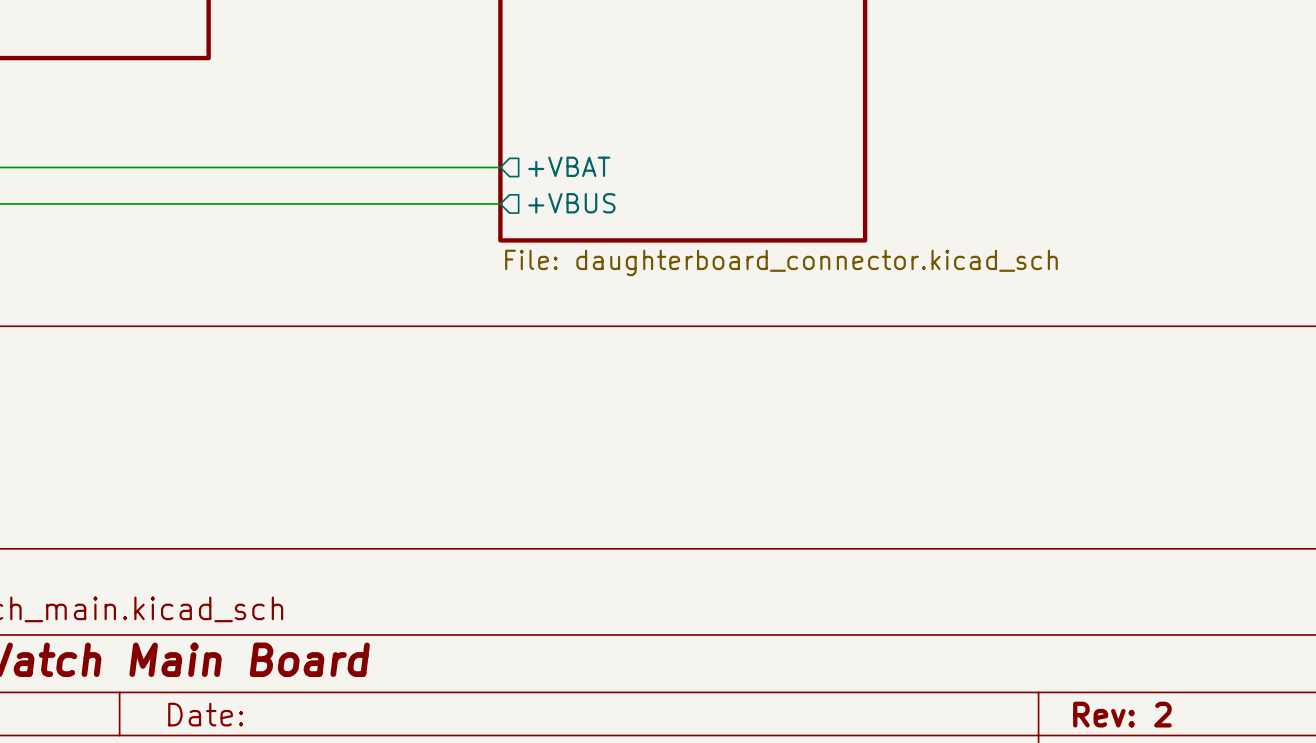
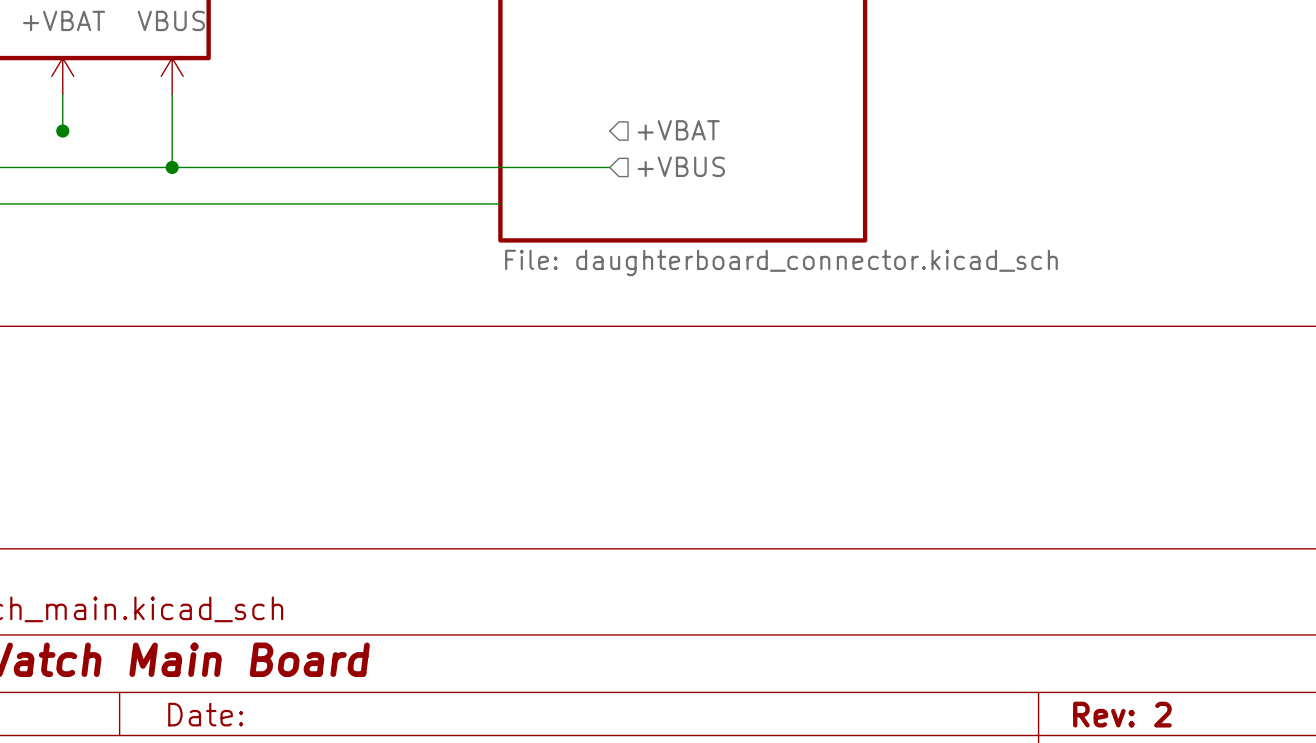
power symbol: none -> +VBAT (62, 76)
power symbol: none -> VBUS (172, 76)
wire: none -> (62, 94) (62, 131)
wire: none -> (172, 94) (172, 167)
junction: none -> (62, 131)
sheet pin position: +VBAT (569, 166) -> +VBAT (678, 130)
junction: none -> (172, 167)
wire: none -> (500, 167) (609, 167)
sheet pin position: +VBUS (571, 203) -> +VBUS (681, 166)

